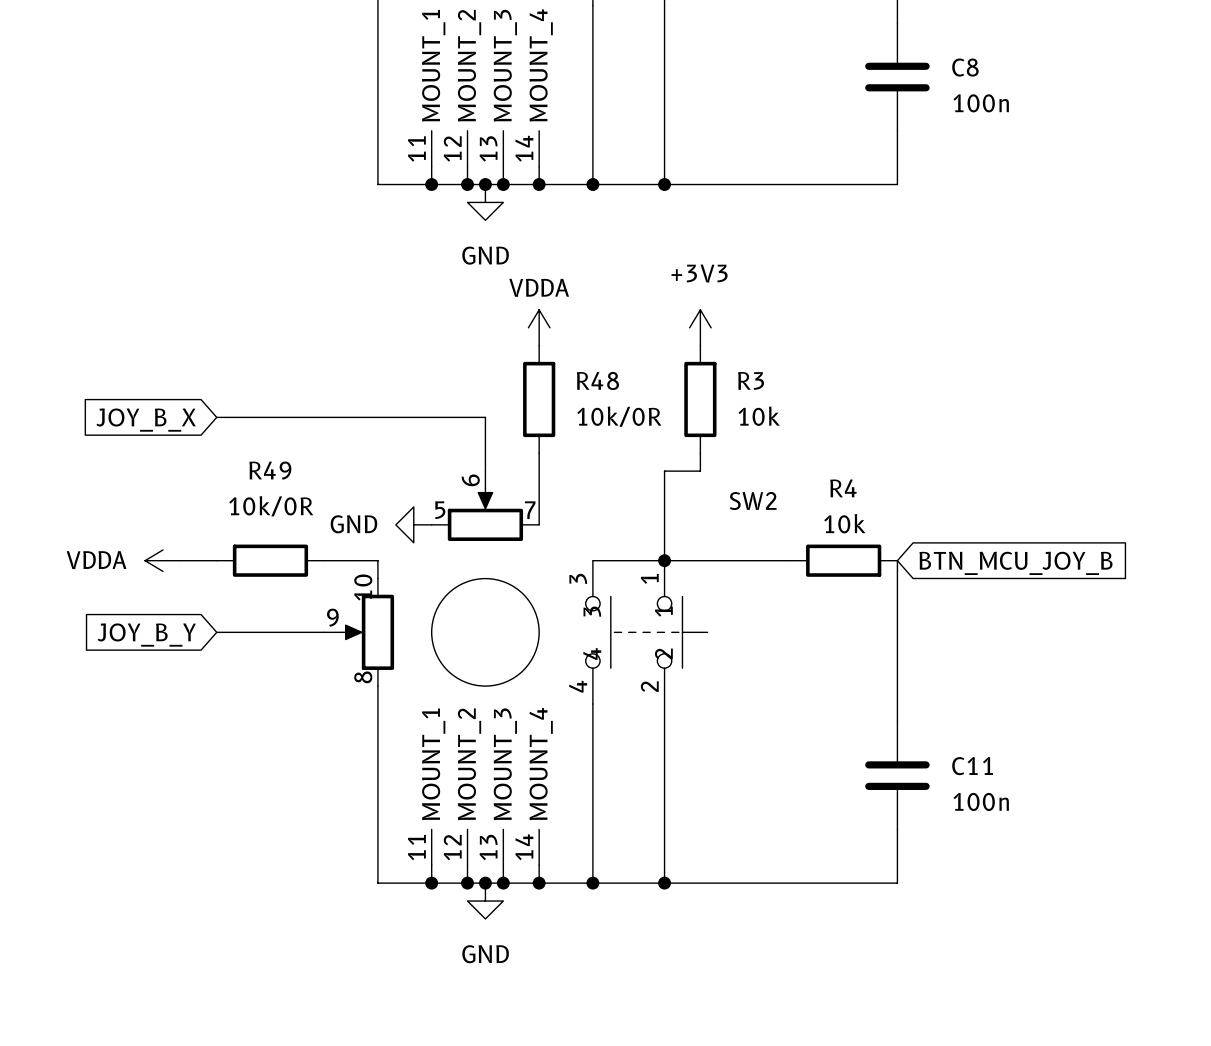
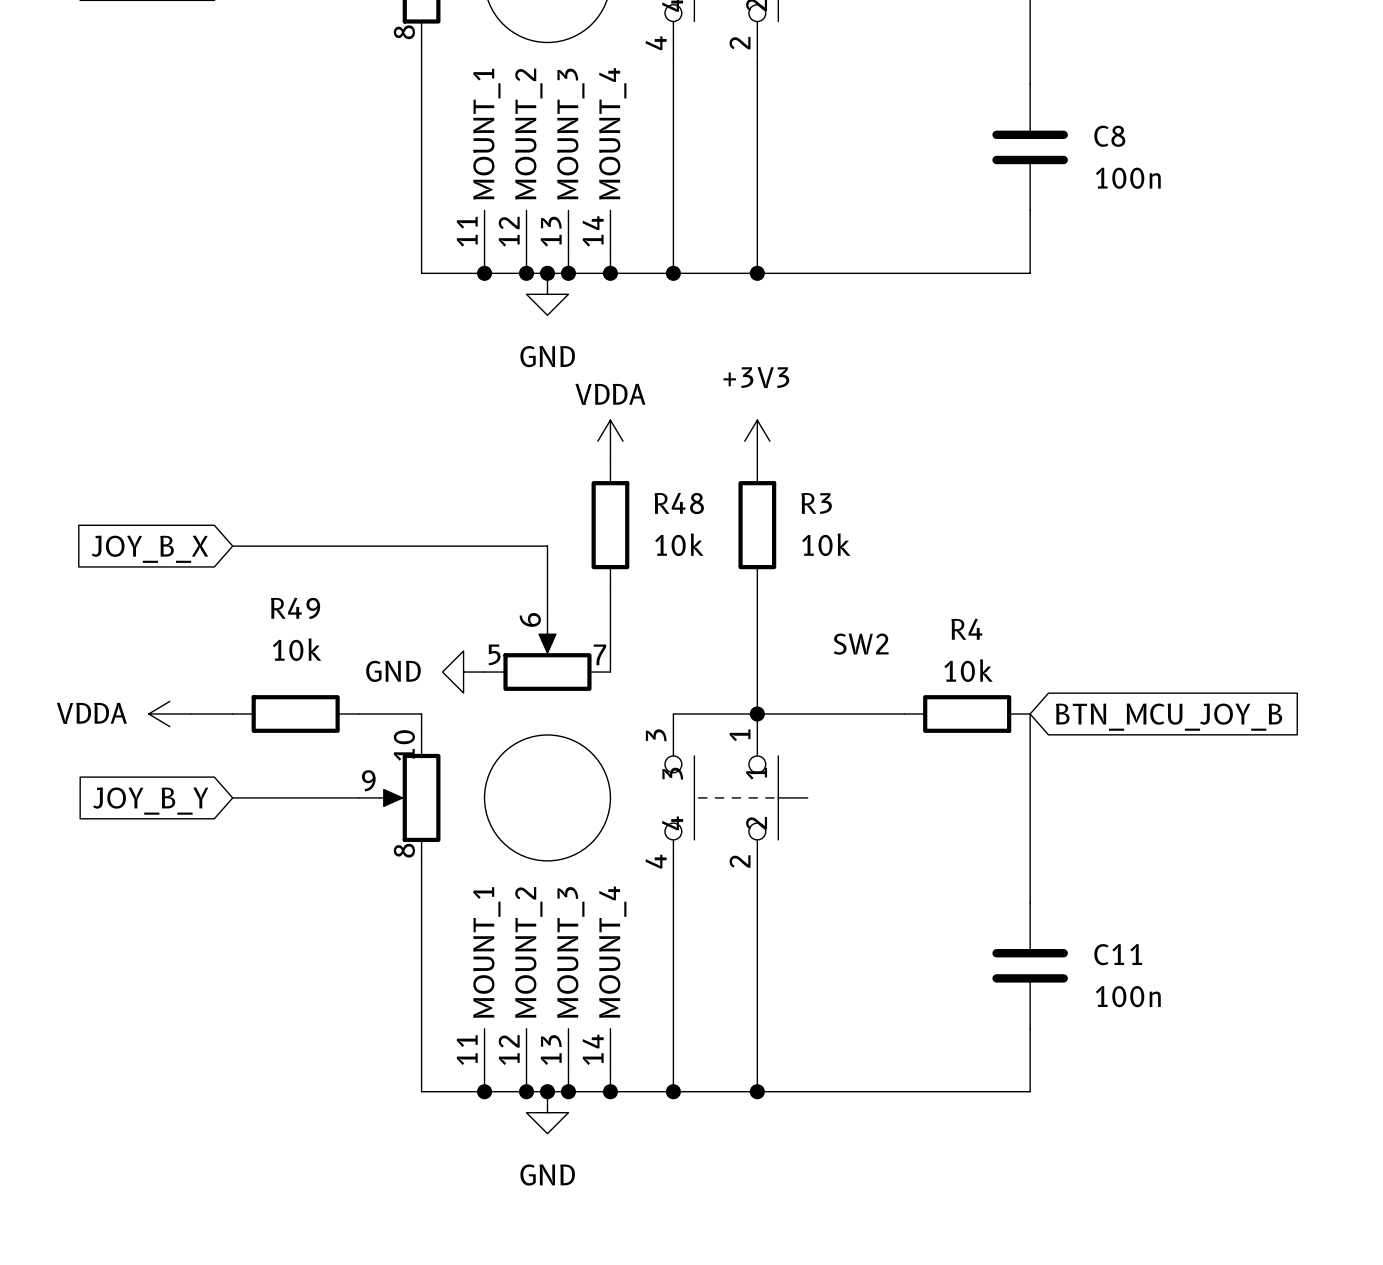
power symbol position: +3V3 (700, 327) -> +3V3 (757, 441)
R3 position: (700, 399) -> (757, 525)
R48 value: 10k/0R (619, 416) -> 10k (679, 544)
wire: (700, 453) (700, 471) (664, 471) -> (757, 588) (757, 609)
R49 value: 10k/0R (271, 506) -> 10k (297, 649)

